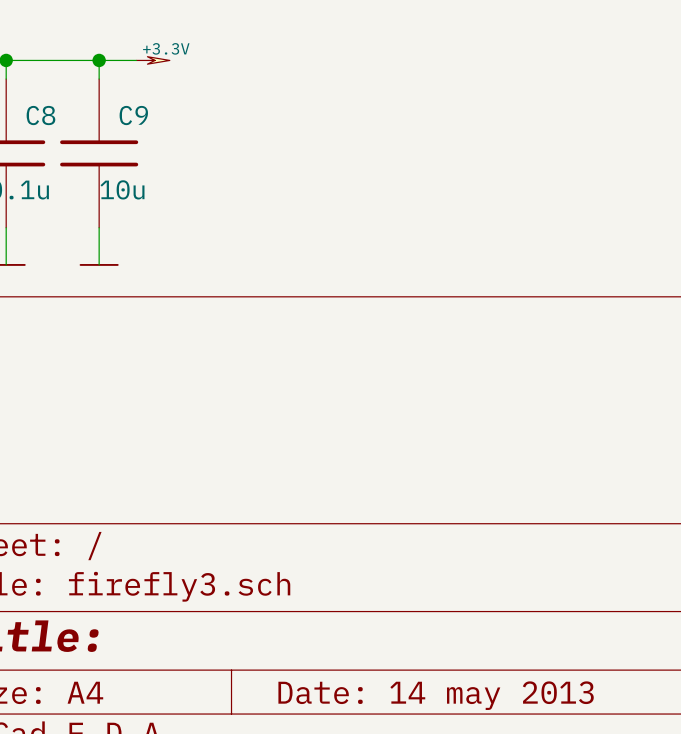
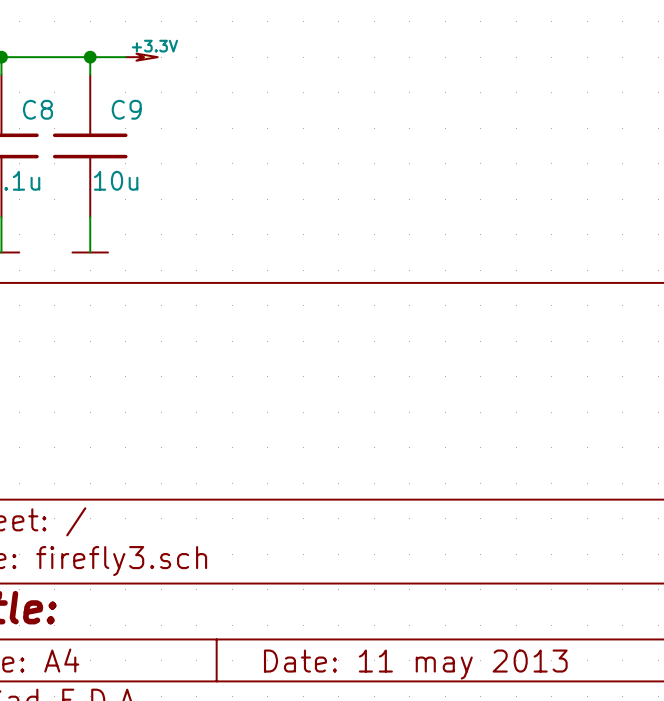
title block: Date: 14 may 2013 (436, 695) -> Date: 11 may 2013 (415, 664)

